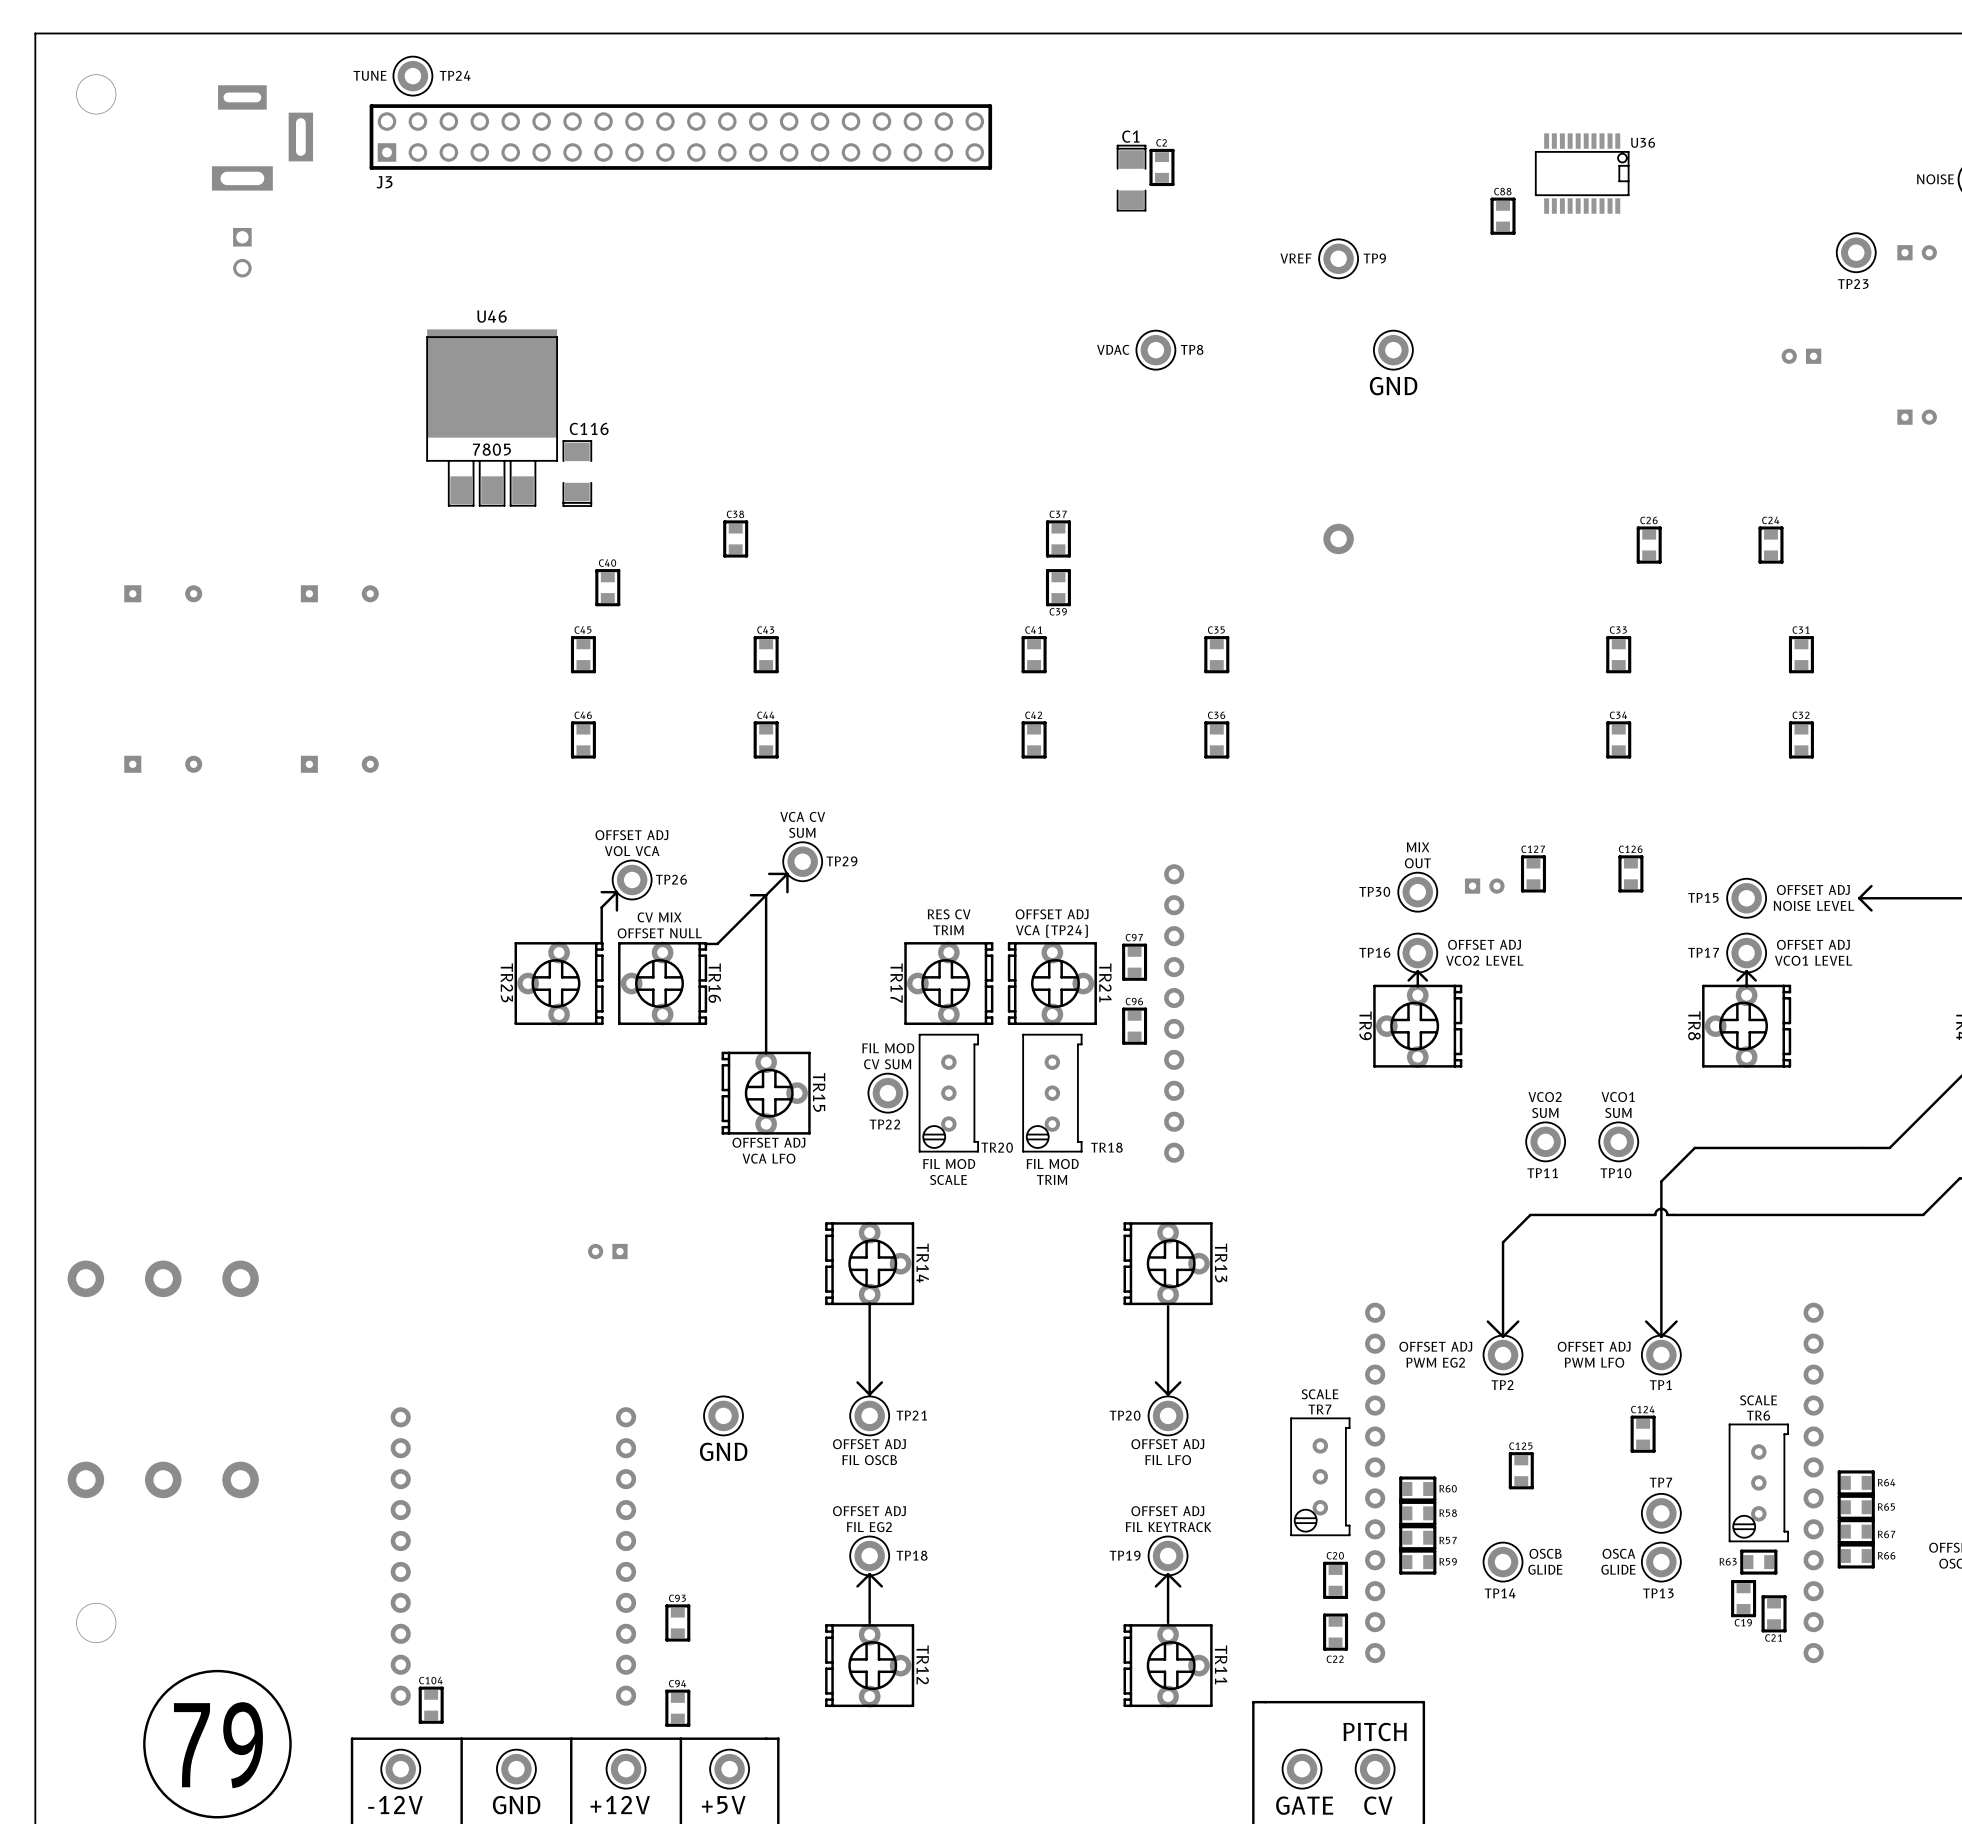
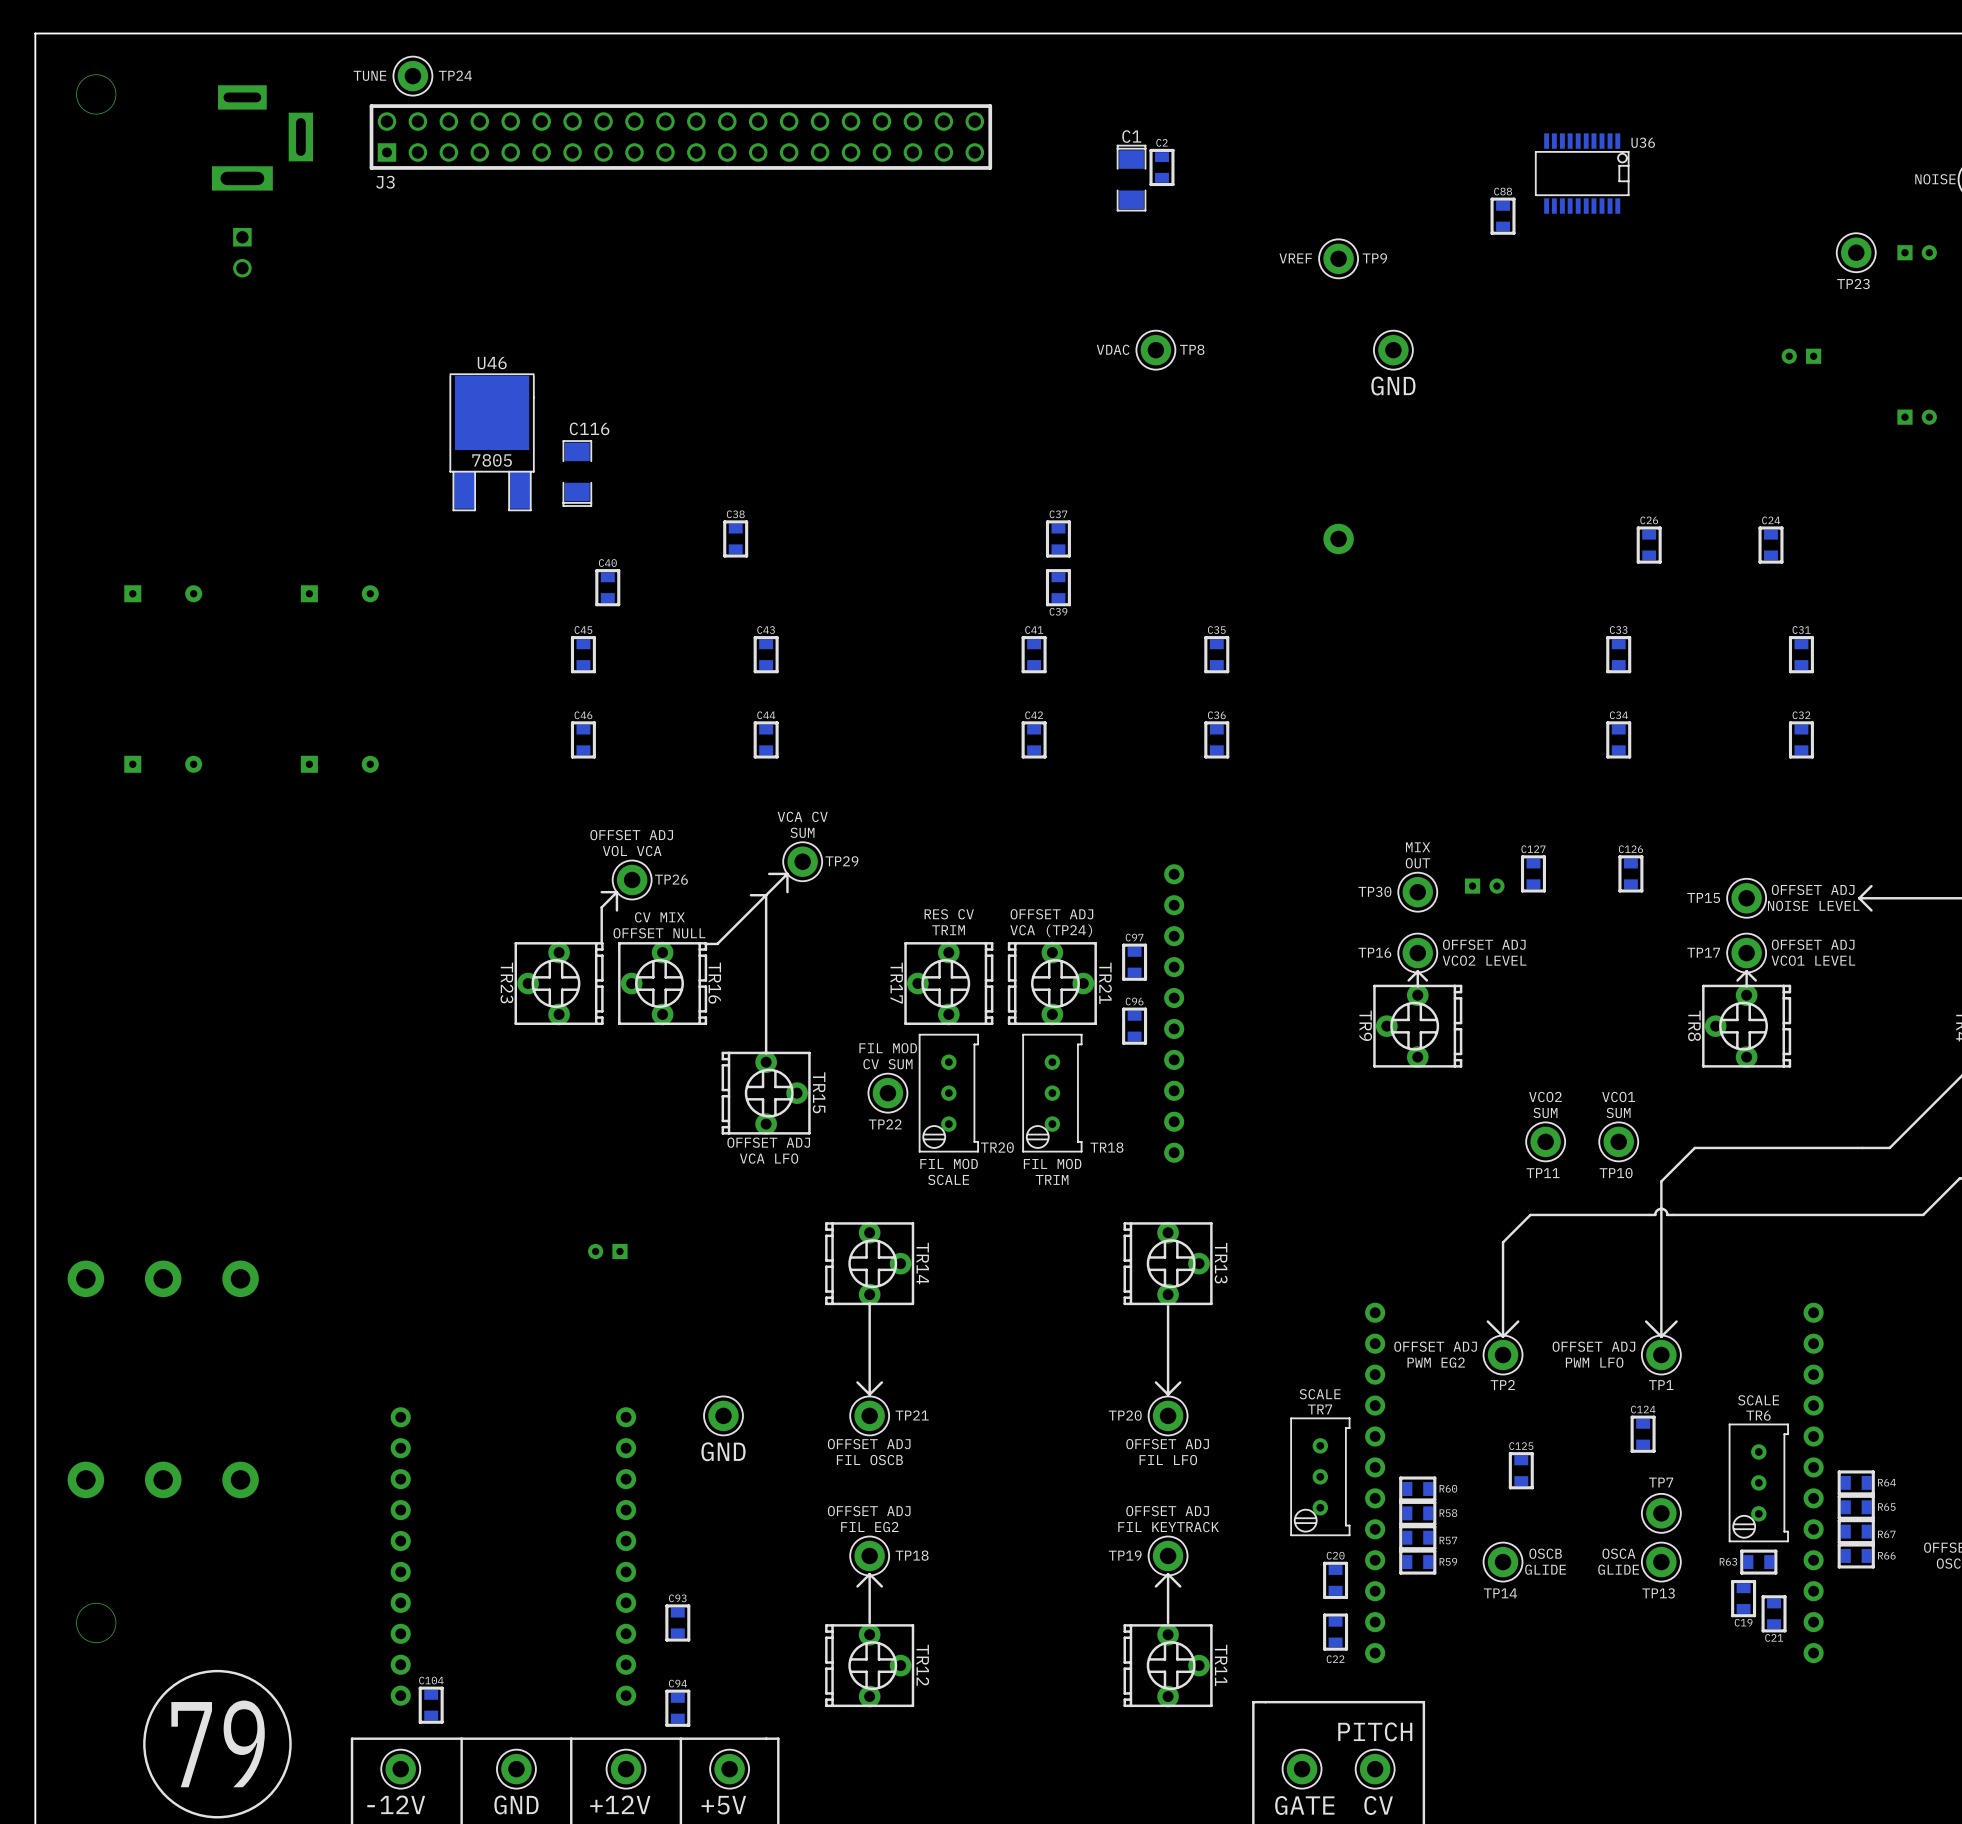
U46 footprint: [426, 329, 558, 507] -> [449, 373, 535, 512]

